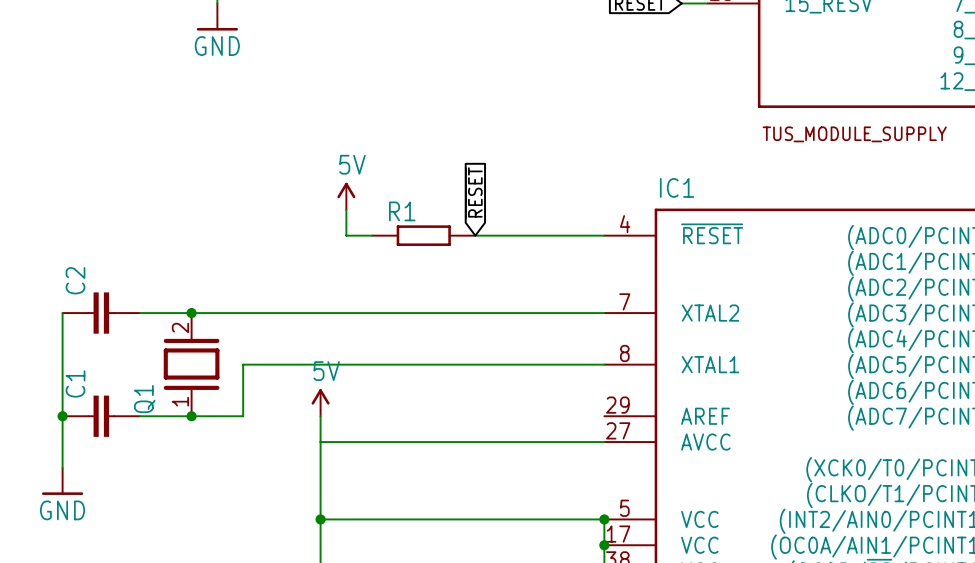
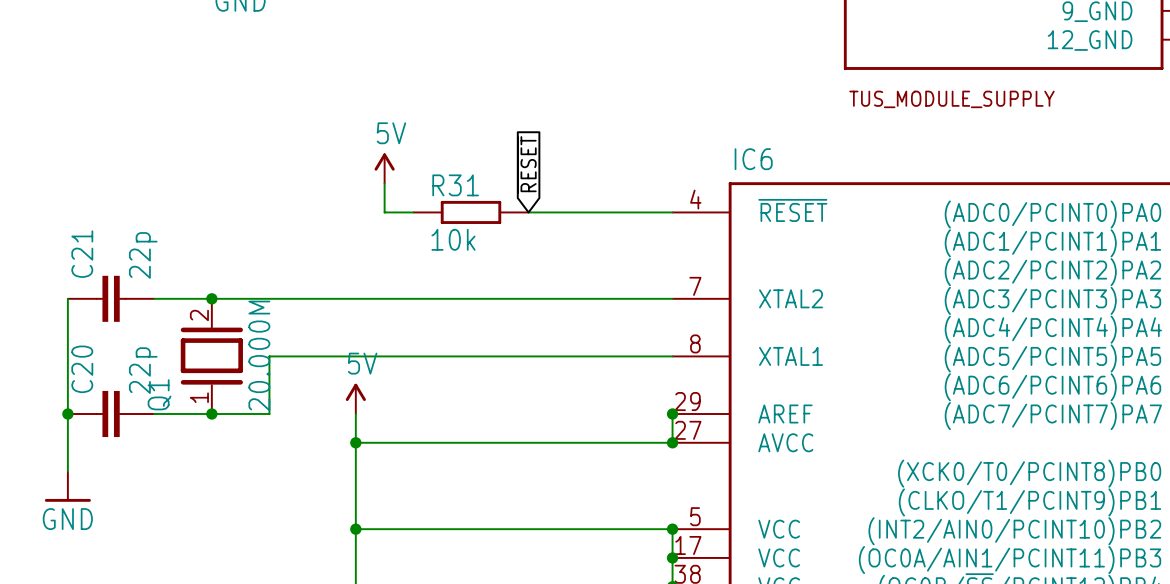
IC1 name: IC1 (677, 187) -> IC6 (753, 159)
R1 name: R1 (402, 211) -> R31 (455, 185)
R1 value: none -> 10k (453, 239)
C2 value: none -> 22p (143, 255)
C2 name: C2 (75, 280) -> C21 (82, 254)
Q1 value: none -> 20.000M (259, 355)
C1 value: none -> 22p (143, 370)
C1 name: C1 (75, 383) -> C20 (82, 369)
wire: none -> (672, 414) (672, 442)
junction: none -> (672, 414)
junction: none -> (355, 442)
junction: none -> (672, 442)

